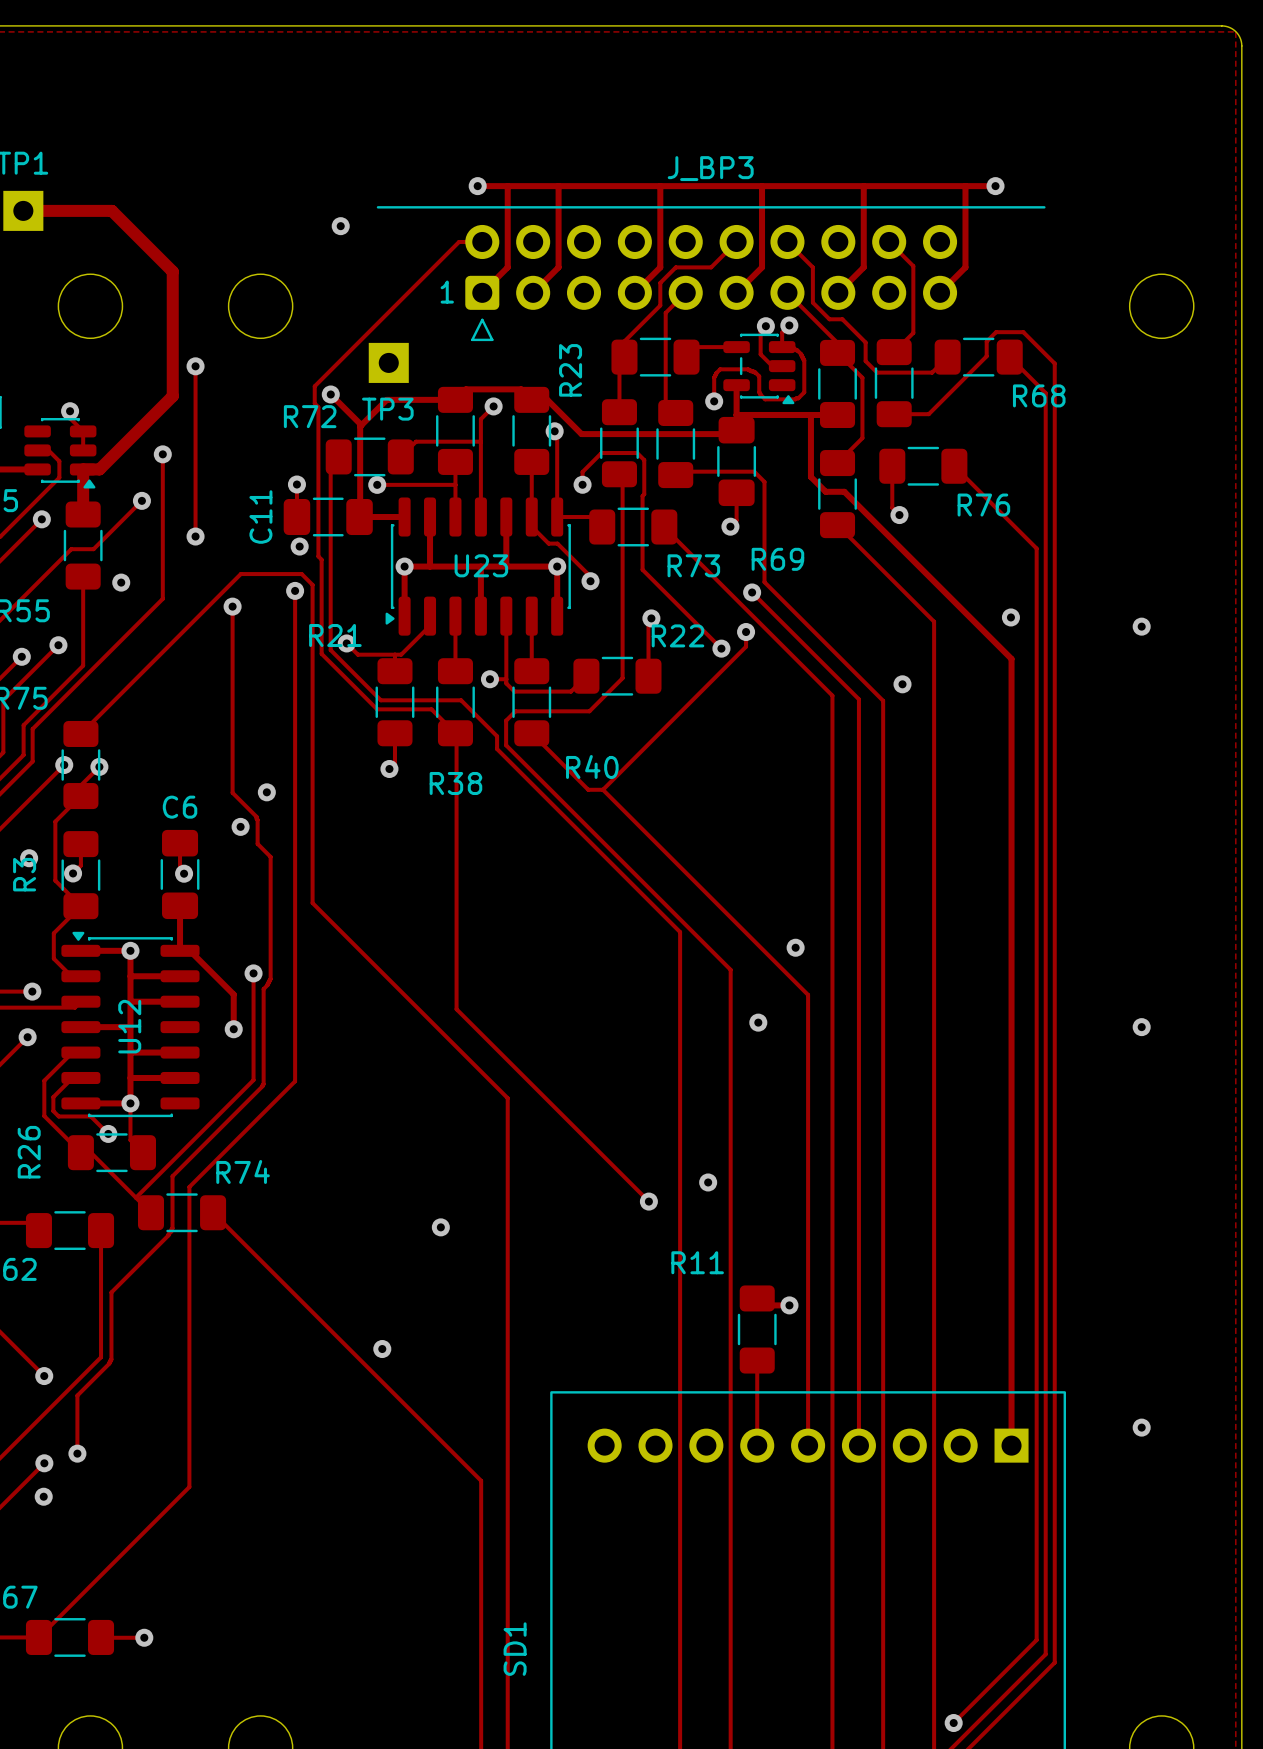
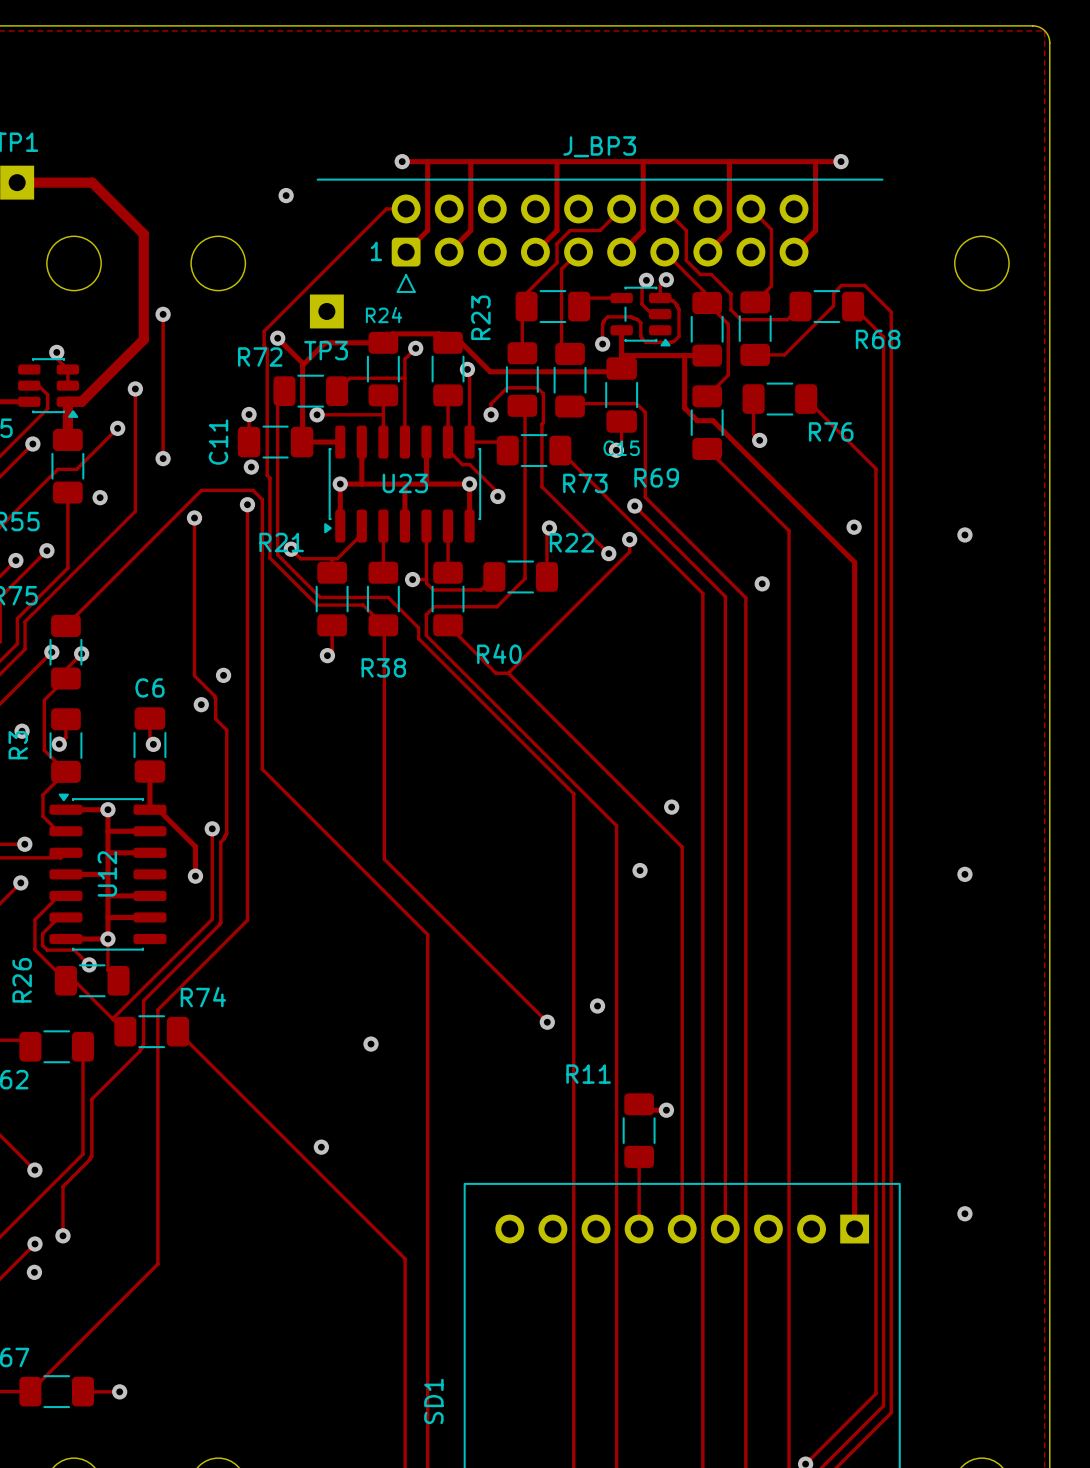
R24 name: none -> R24 (384, 315)
C15 name: none -> C15 (621, 448)

